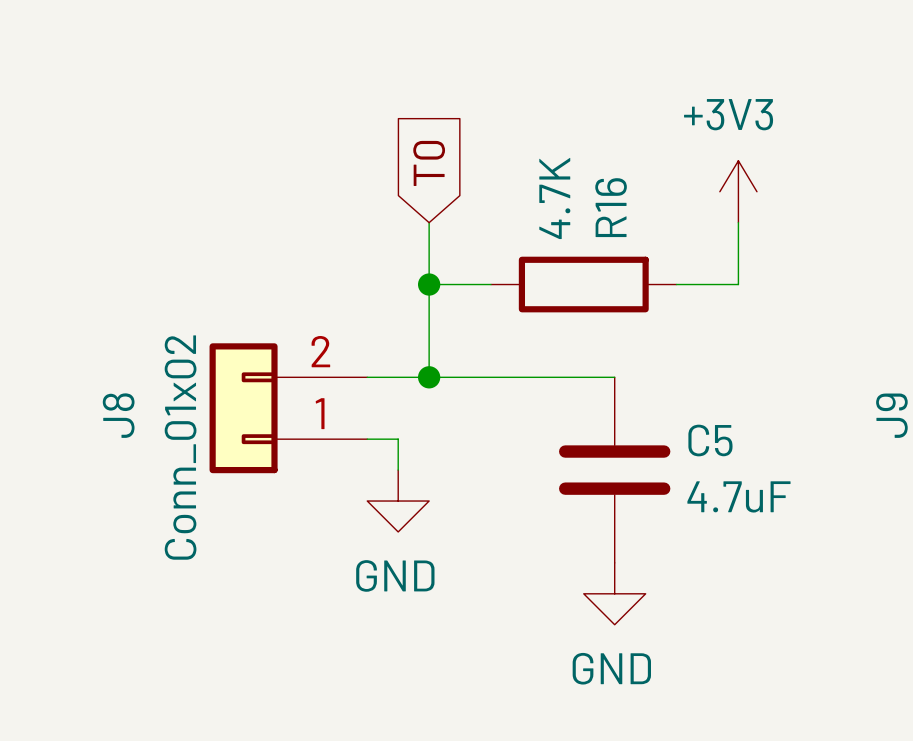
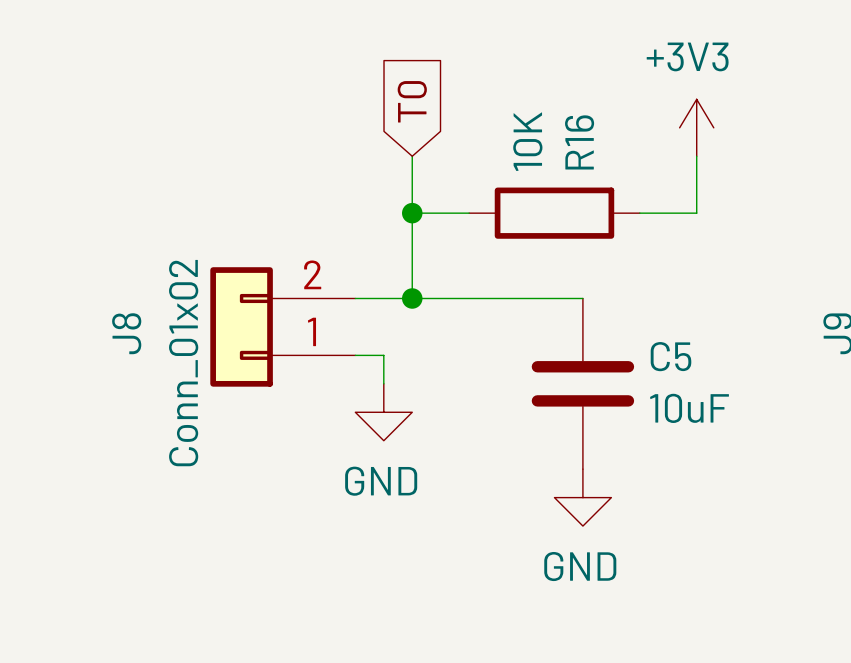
R16 value: 4.7K (554, 198) -> 10K (527, 141)
C5 value: 4.7uF (738, 496) -> 10uF (689, 408)

